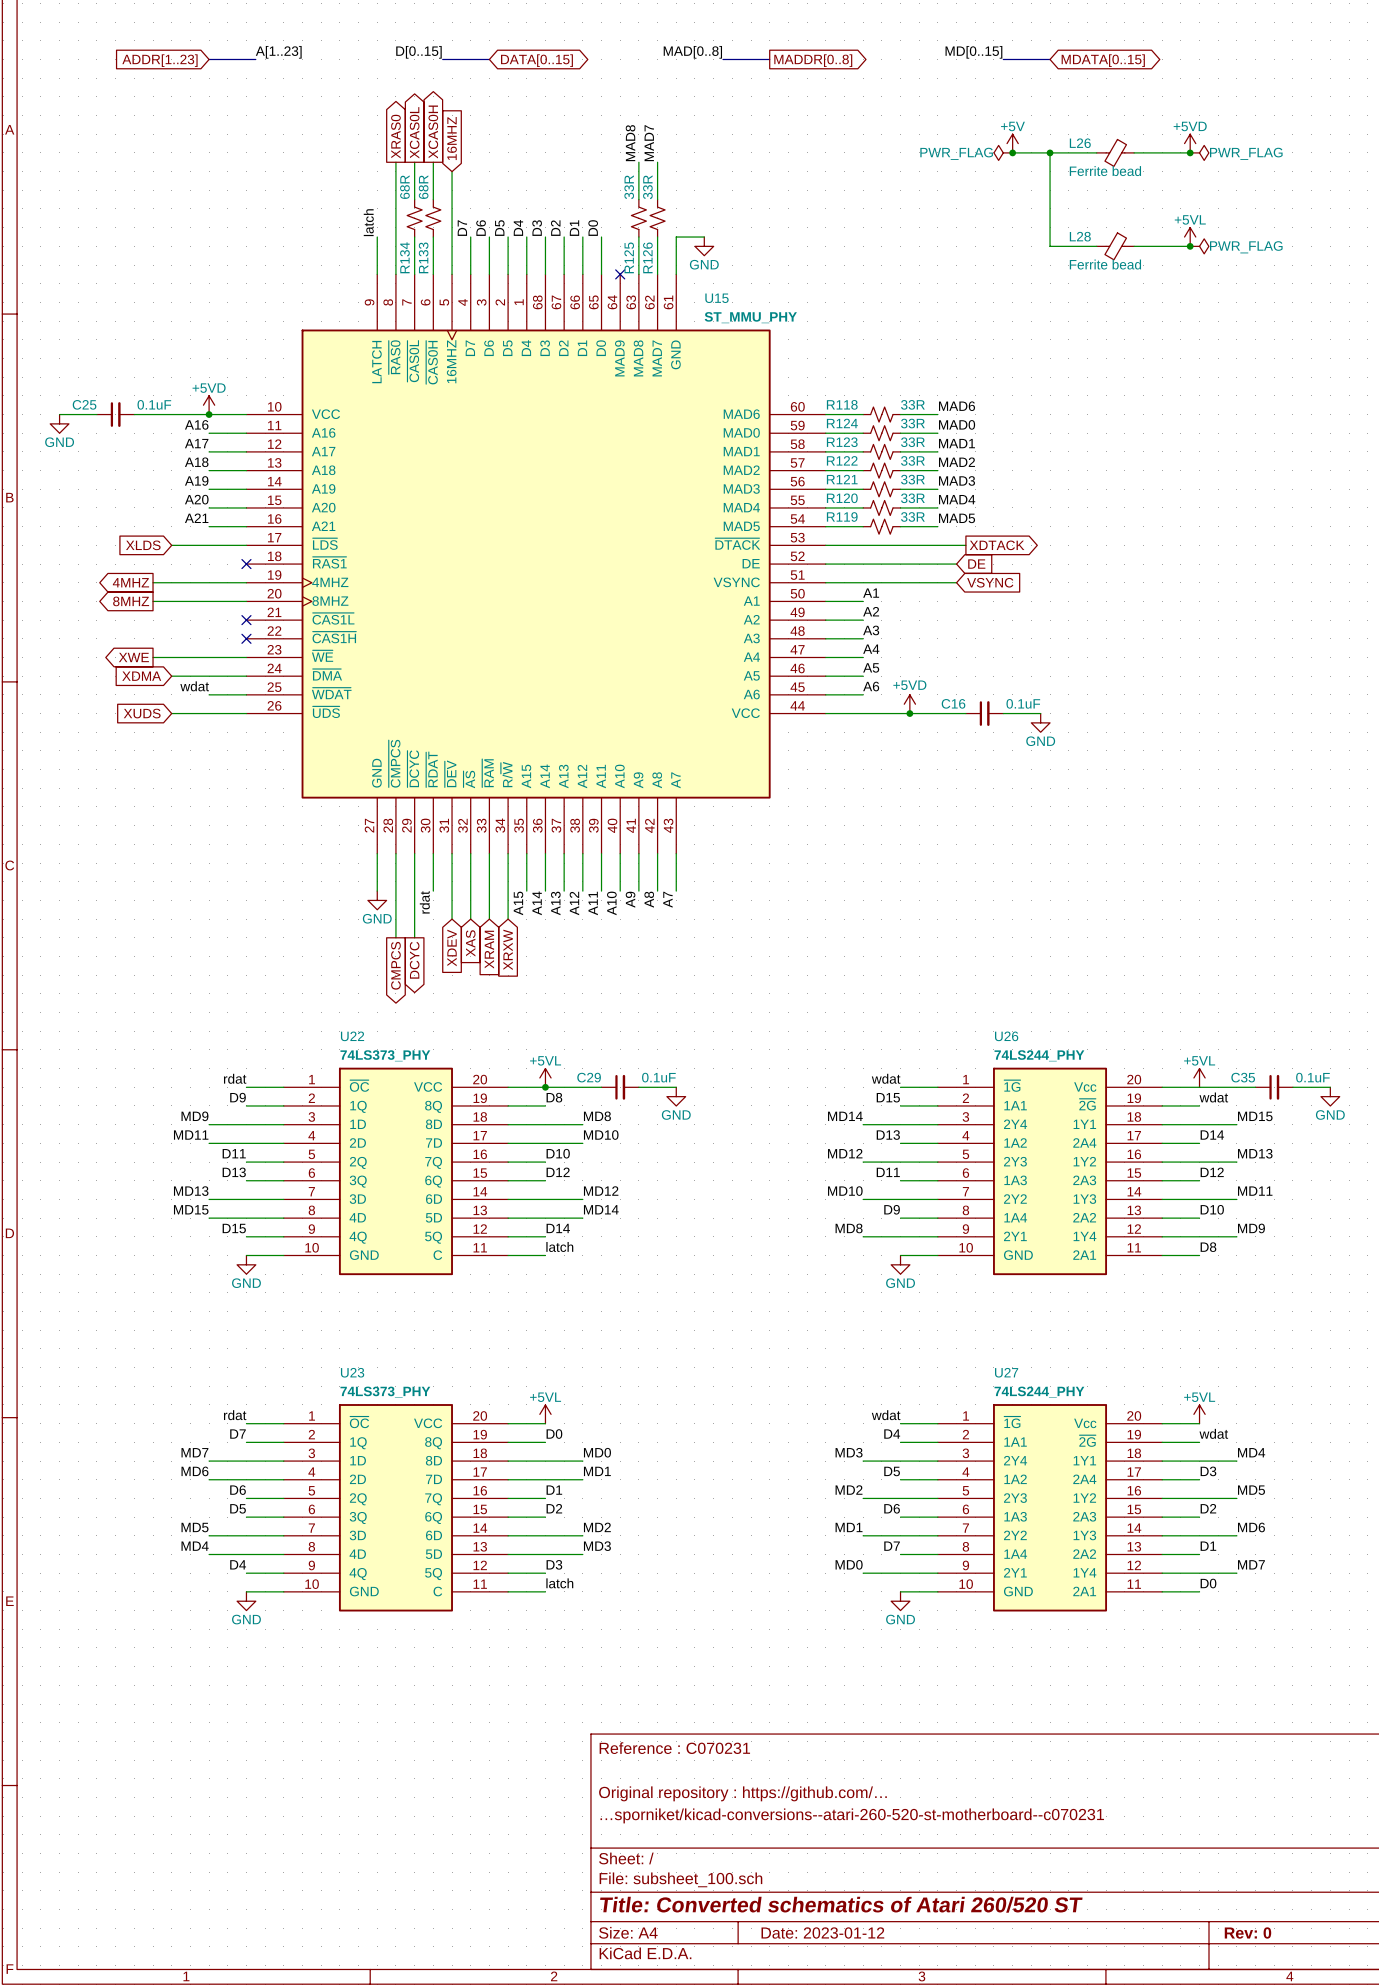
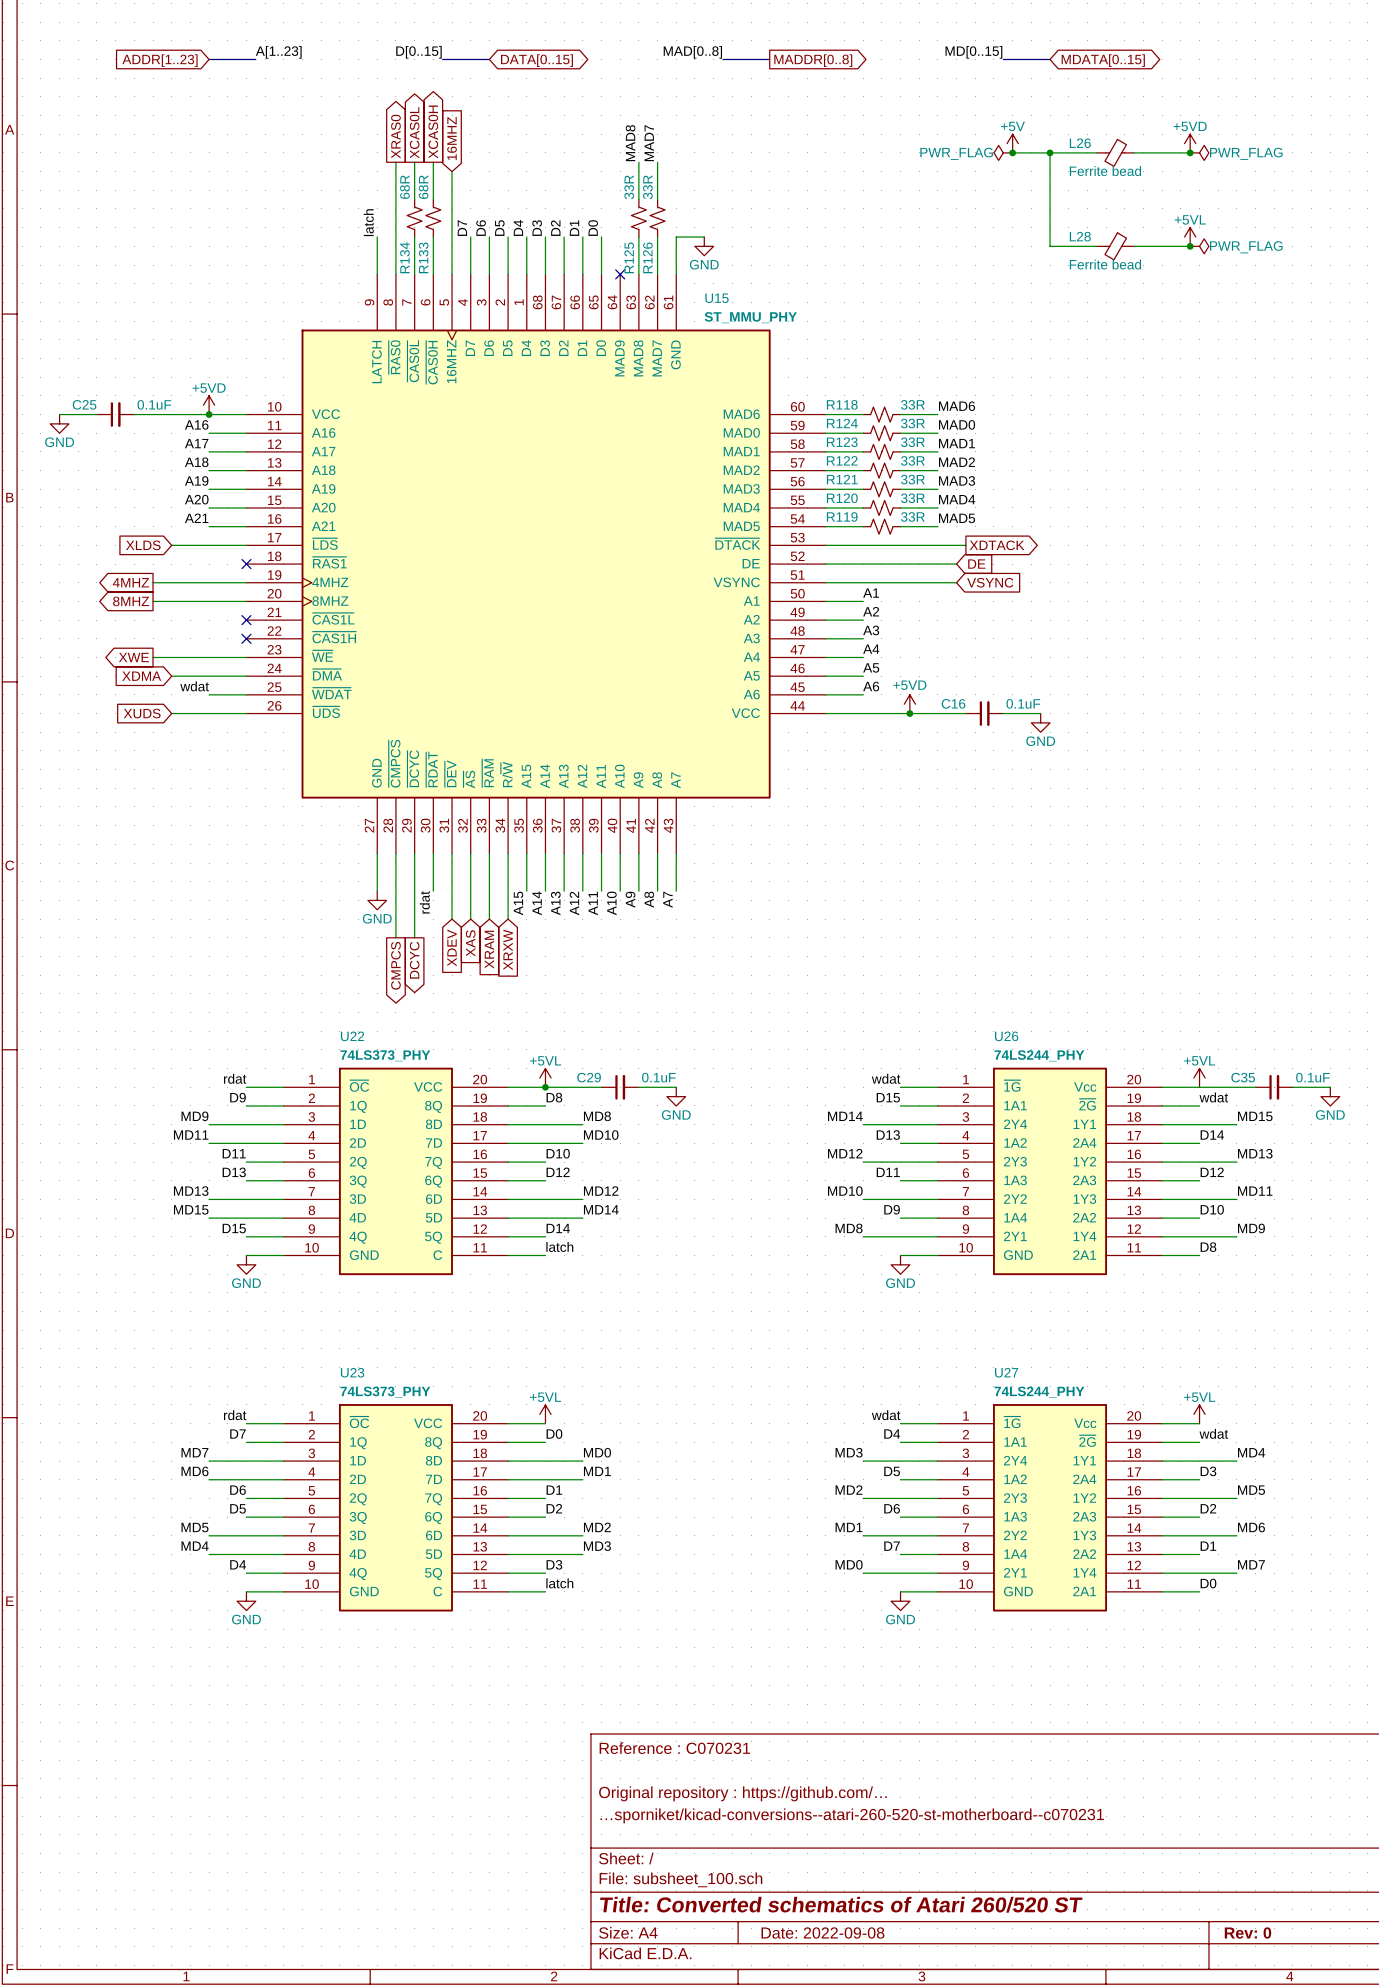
title block: Date: 2023-01-12 (822, 1933) -> Date: 2022-09-08 (822, 1933)

